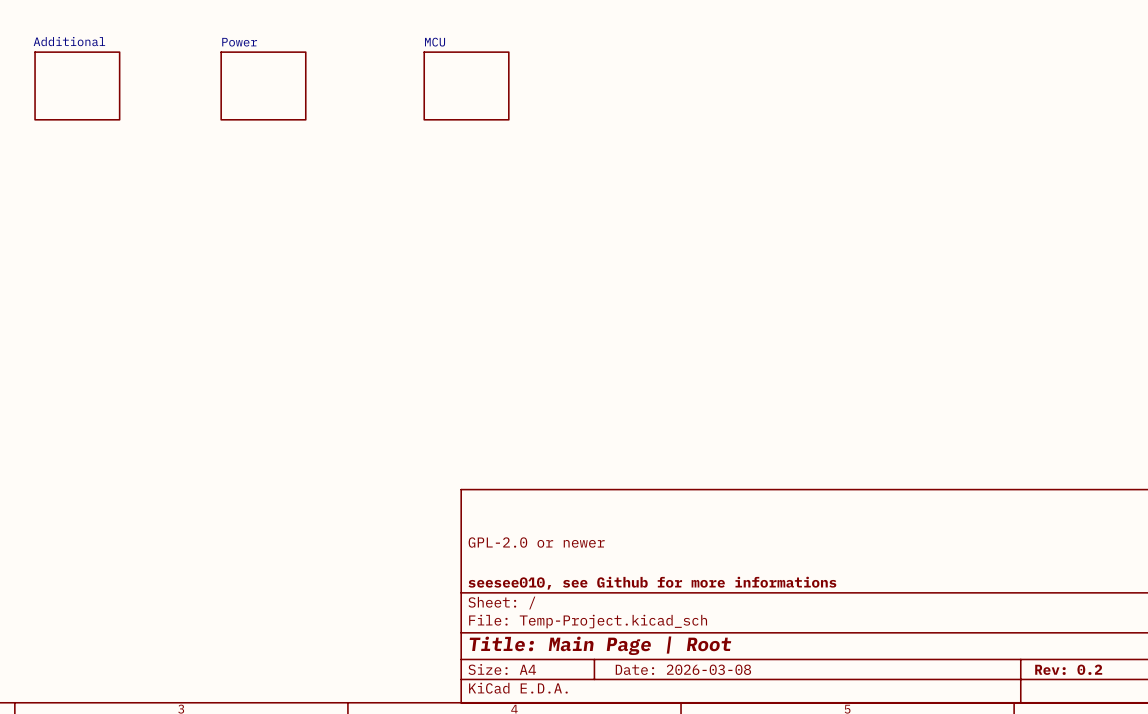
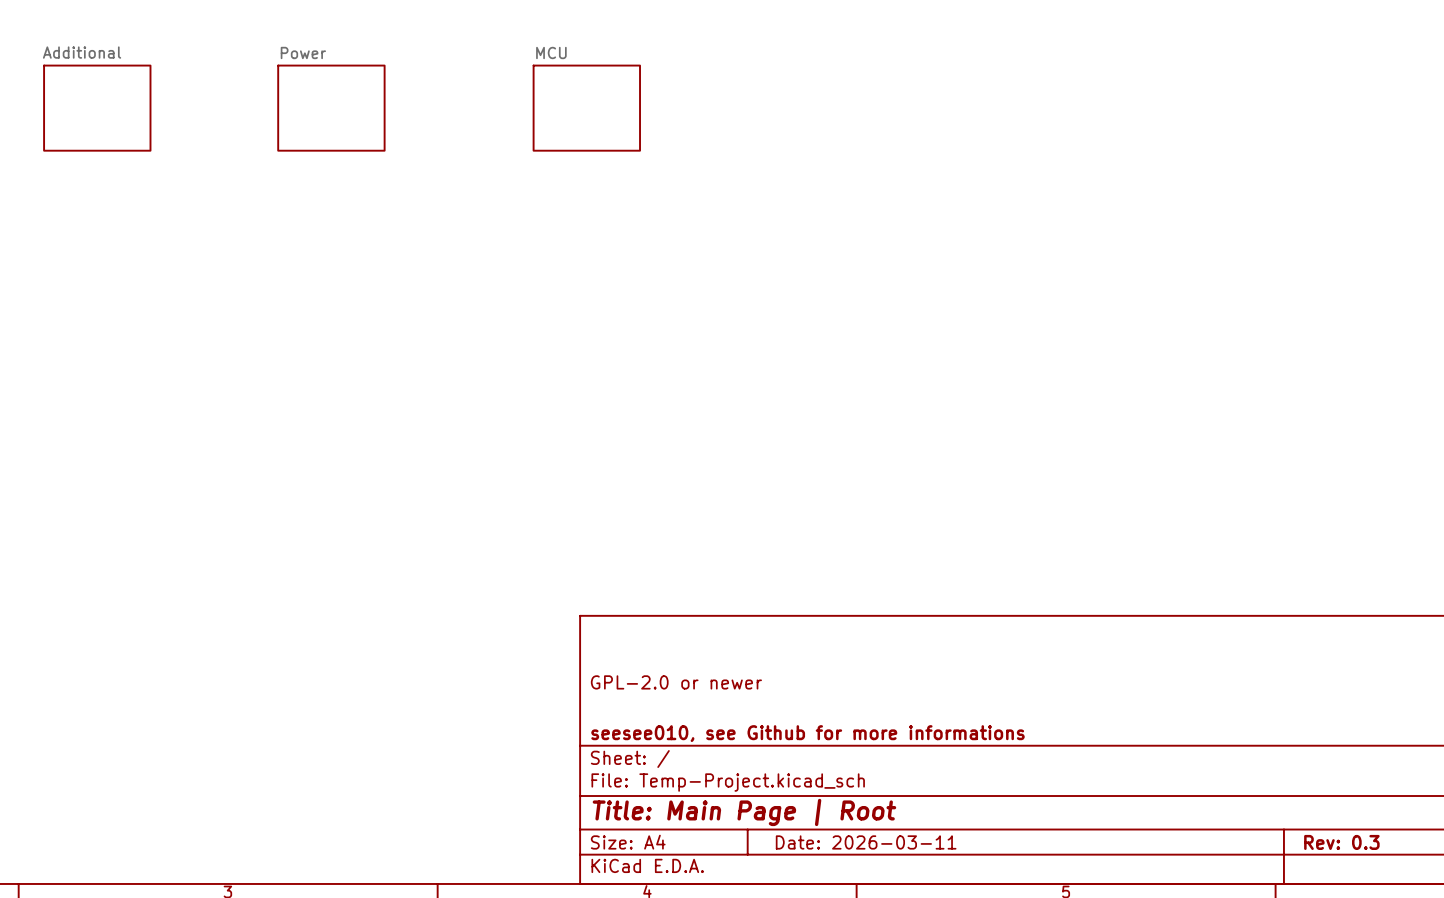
title block: Date: 2026-03-08 (683, 669) -> Date: 2026-03-11 (866, 842)
title block: Rev: 0.2 (1068, 669) -> Rev: 0.3 (1341, 842)

